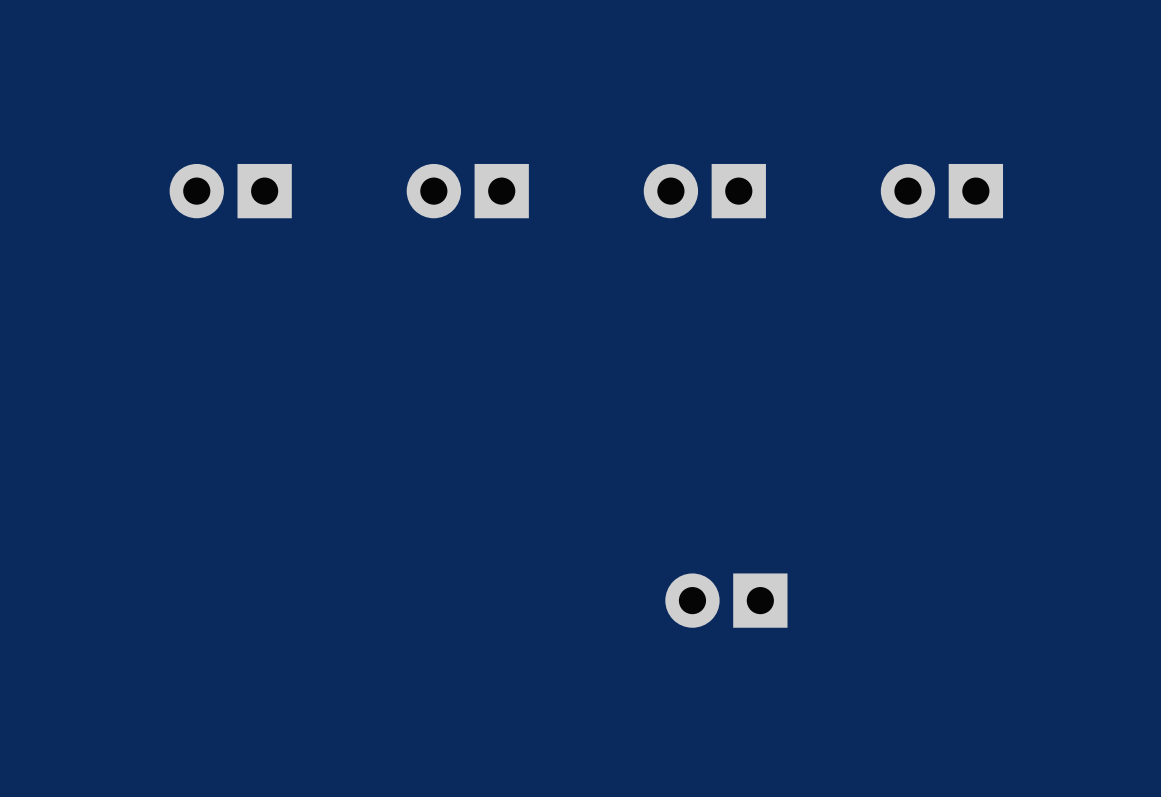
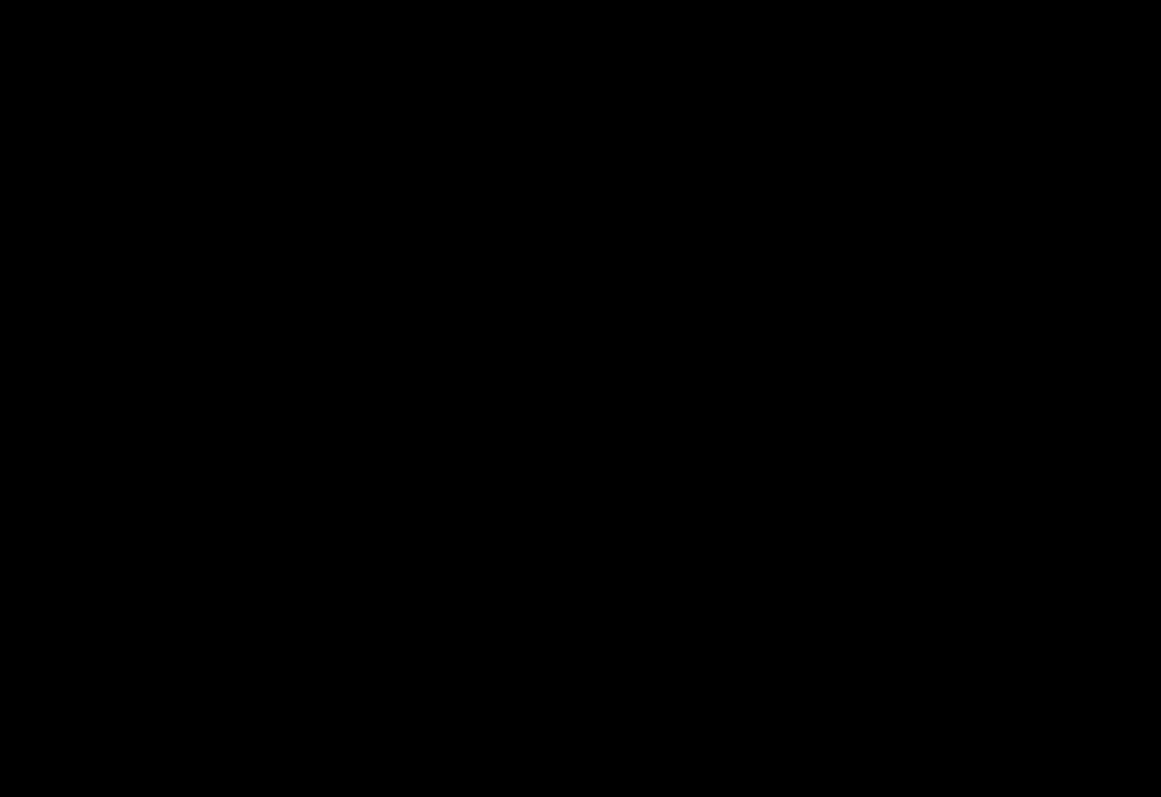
part: (230, 191) -> none
part: (467, 191) -> none
part: (704, 191) -> none
part: (941, 191) -> none
part: (726, 600) -> none

